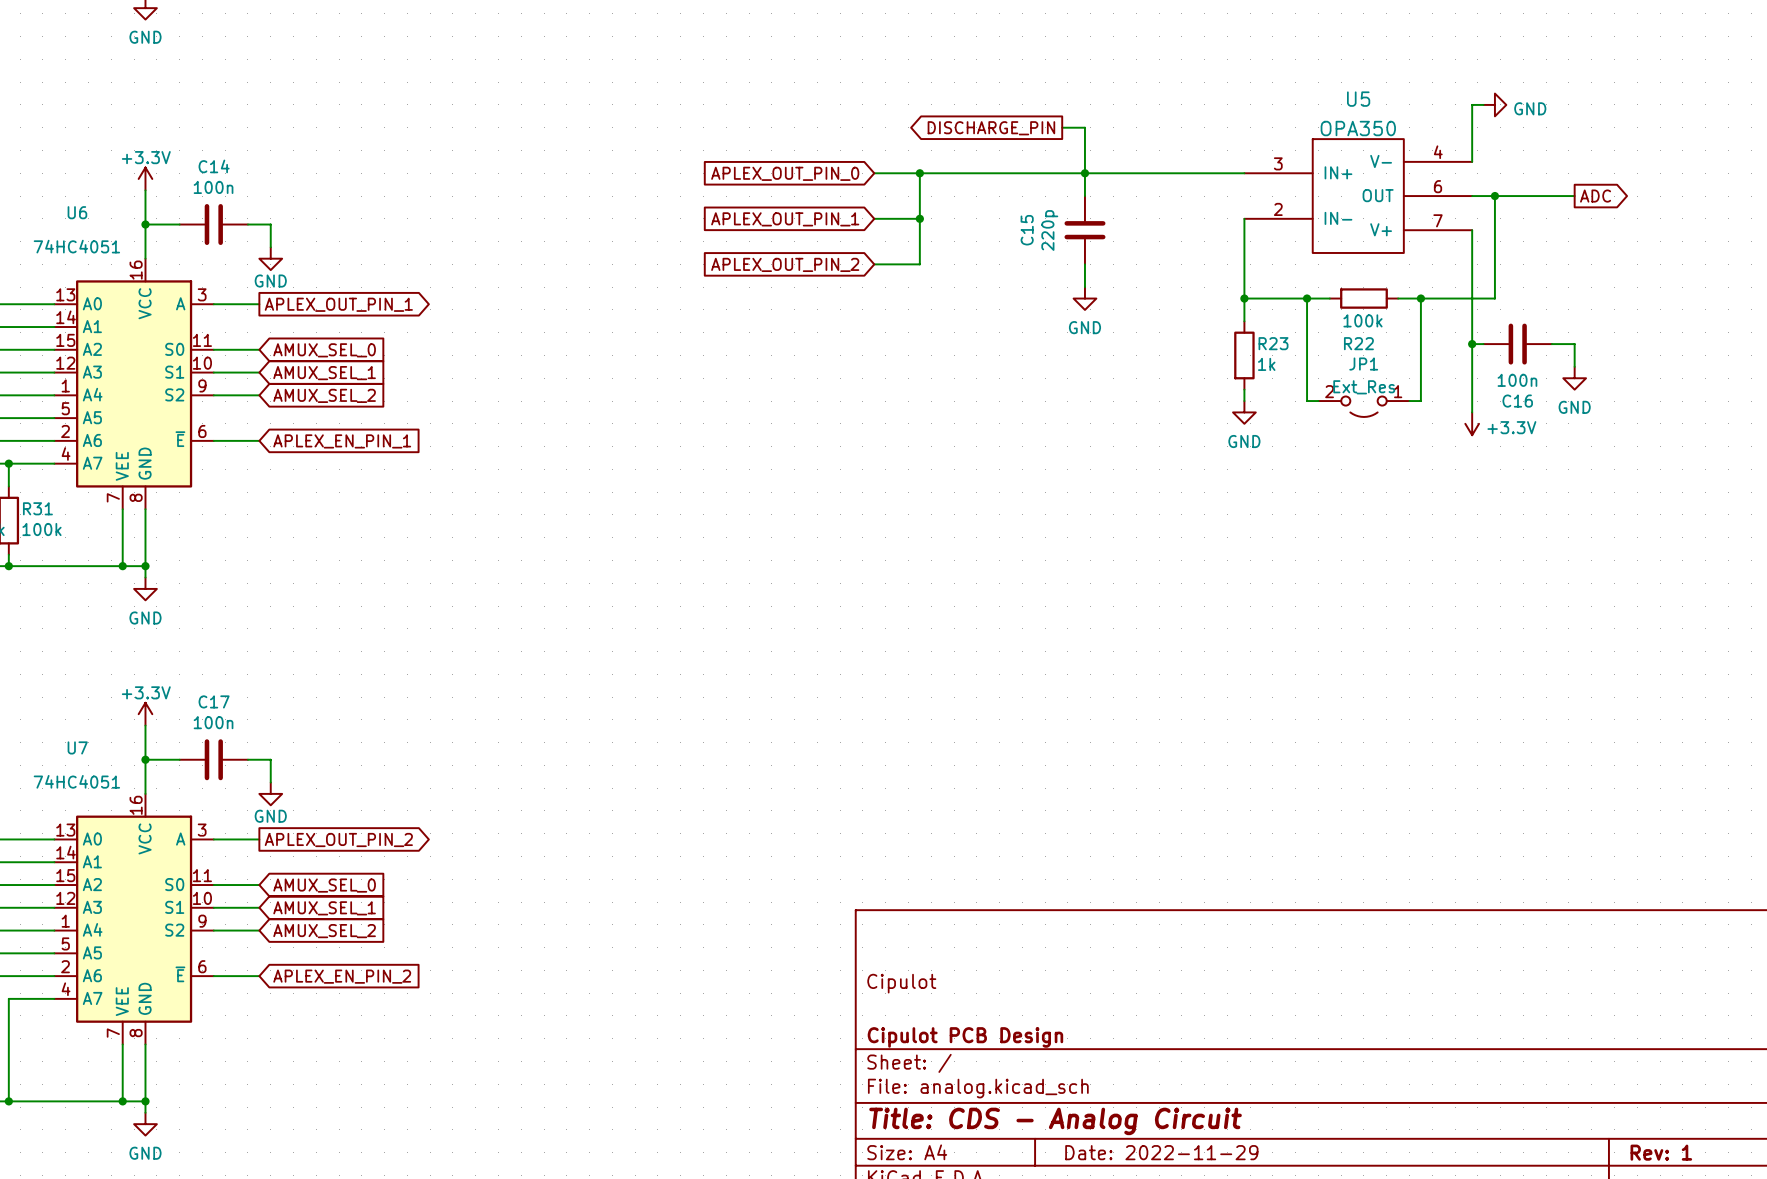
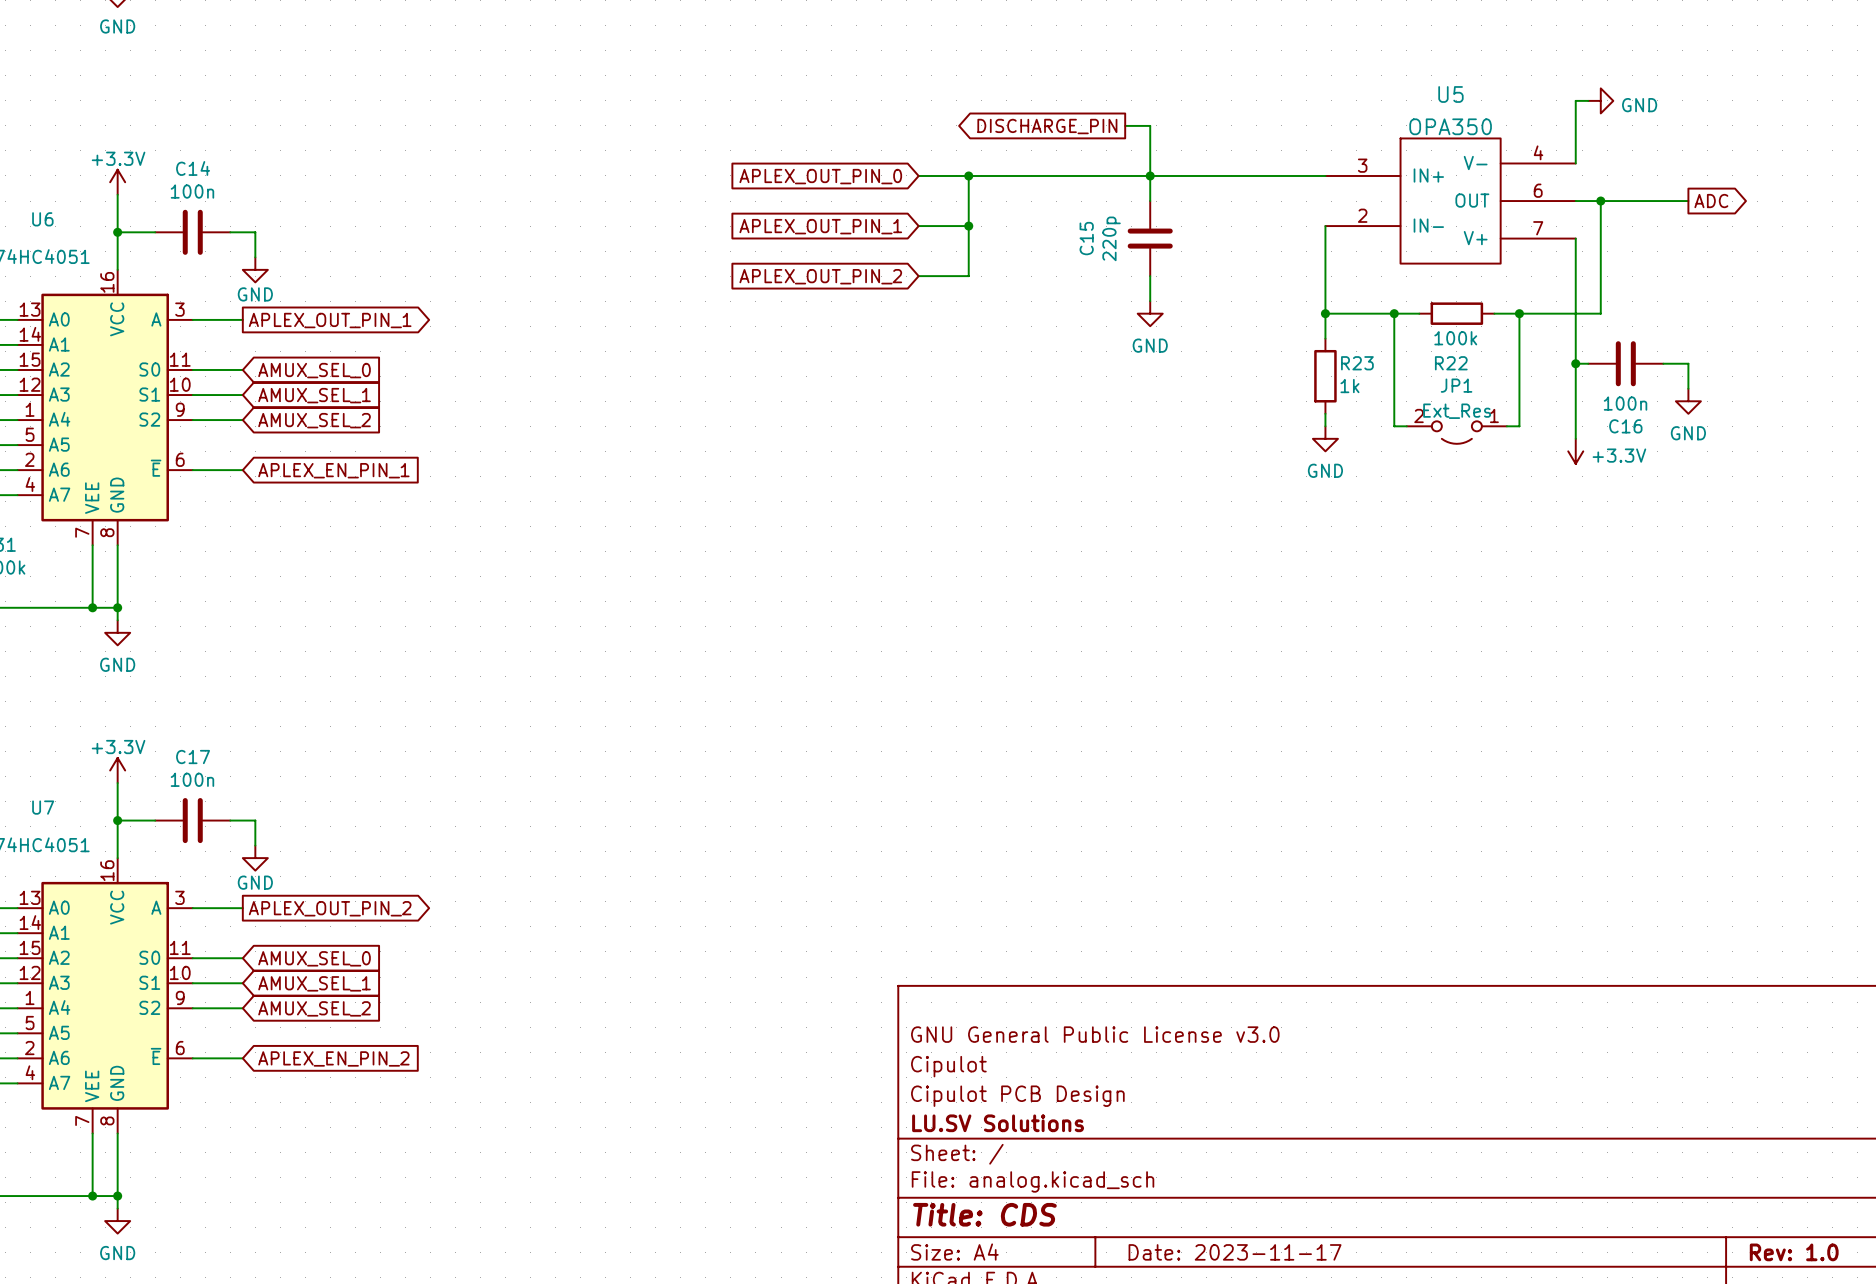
title block: none -> GNU General Public License v3.0 (1095, 1034)
title block: none -> Cipulot PCB Design (1017, 1096)
title block: Cipulot PCB Design (965, 1037) -> LU.SV Solutions (998, 1123)
title block: Title: CDS - Analog Circuit (1055, 1121) -> Title: CDS (984, 1214)
title block: Date: 2022-11-29 (1161, 1152) -> Date: 2023-11-17 (1235, 1252)
title block: Rev: 1 (1661, 1152) -> Rev: 1.0 (1794, 1252)

